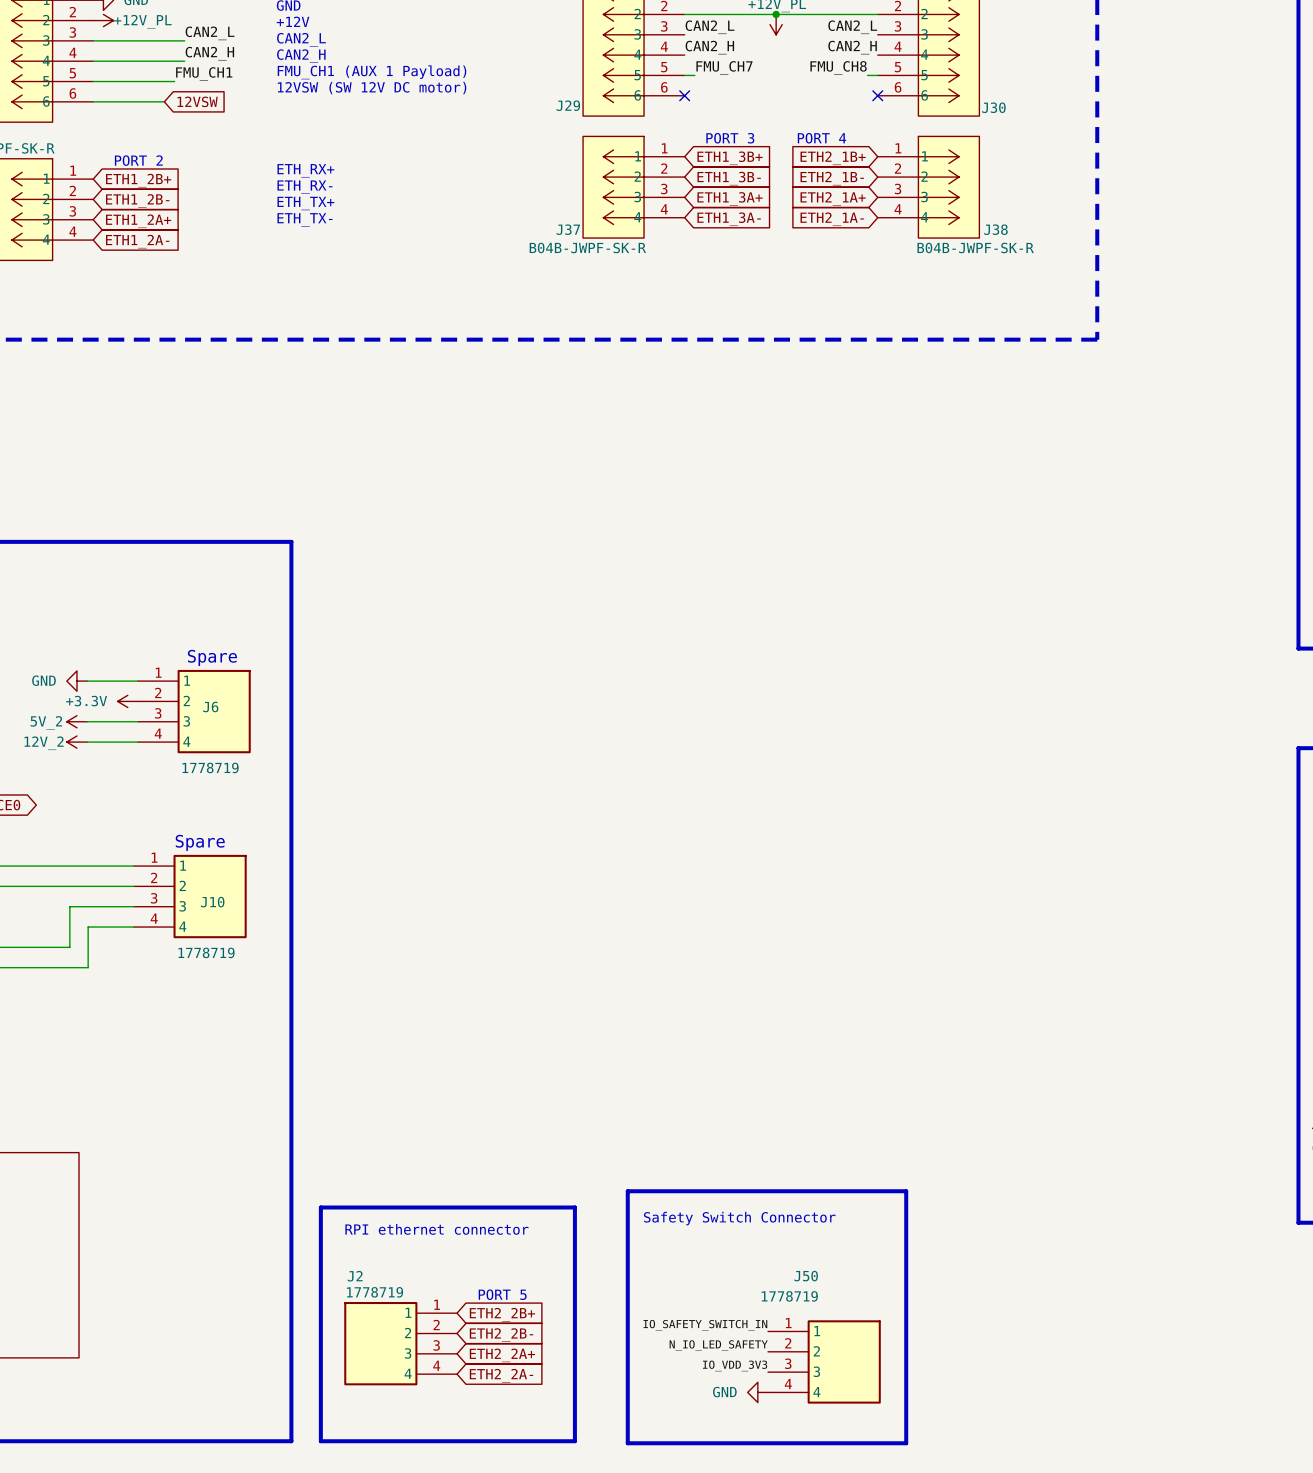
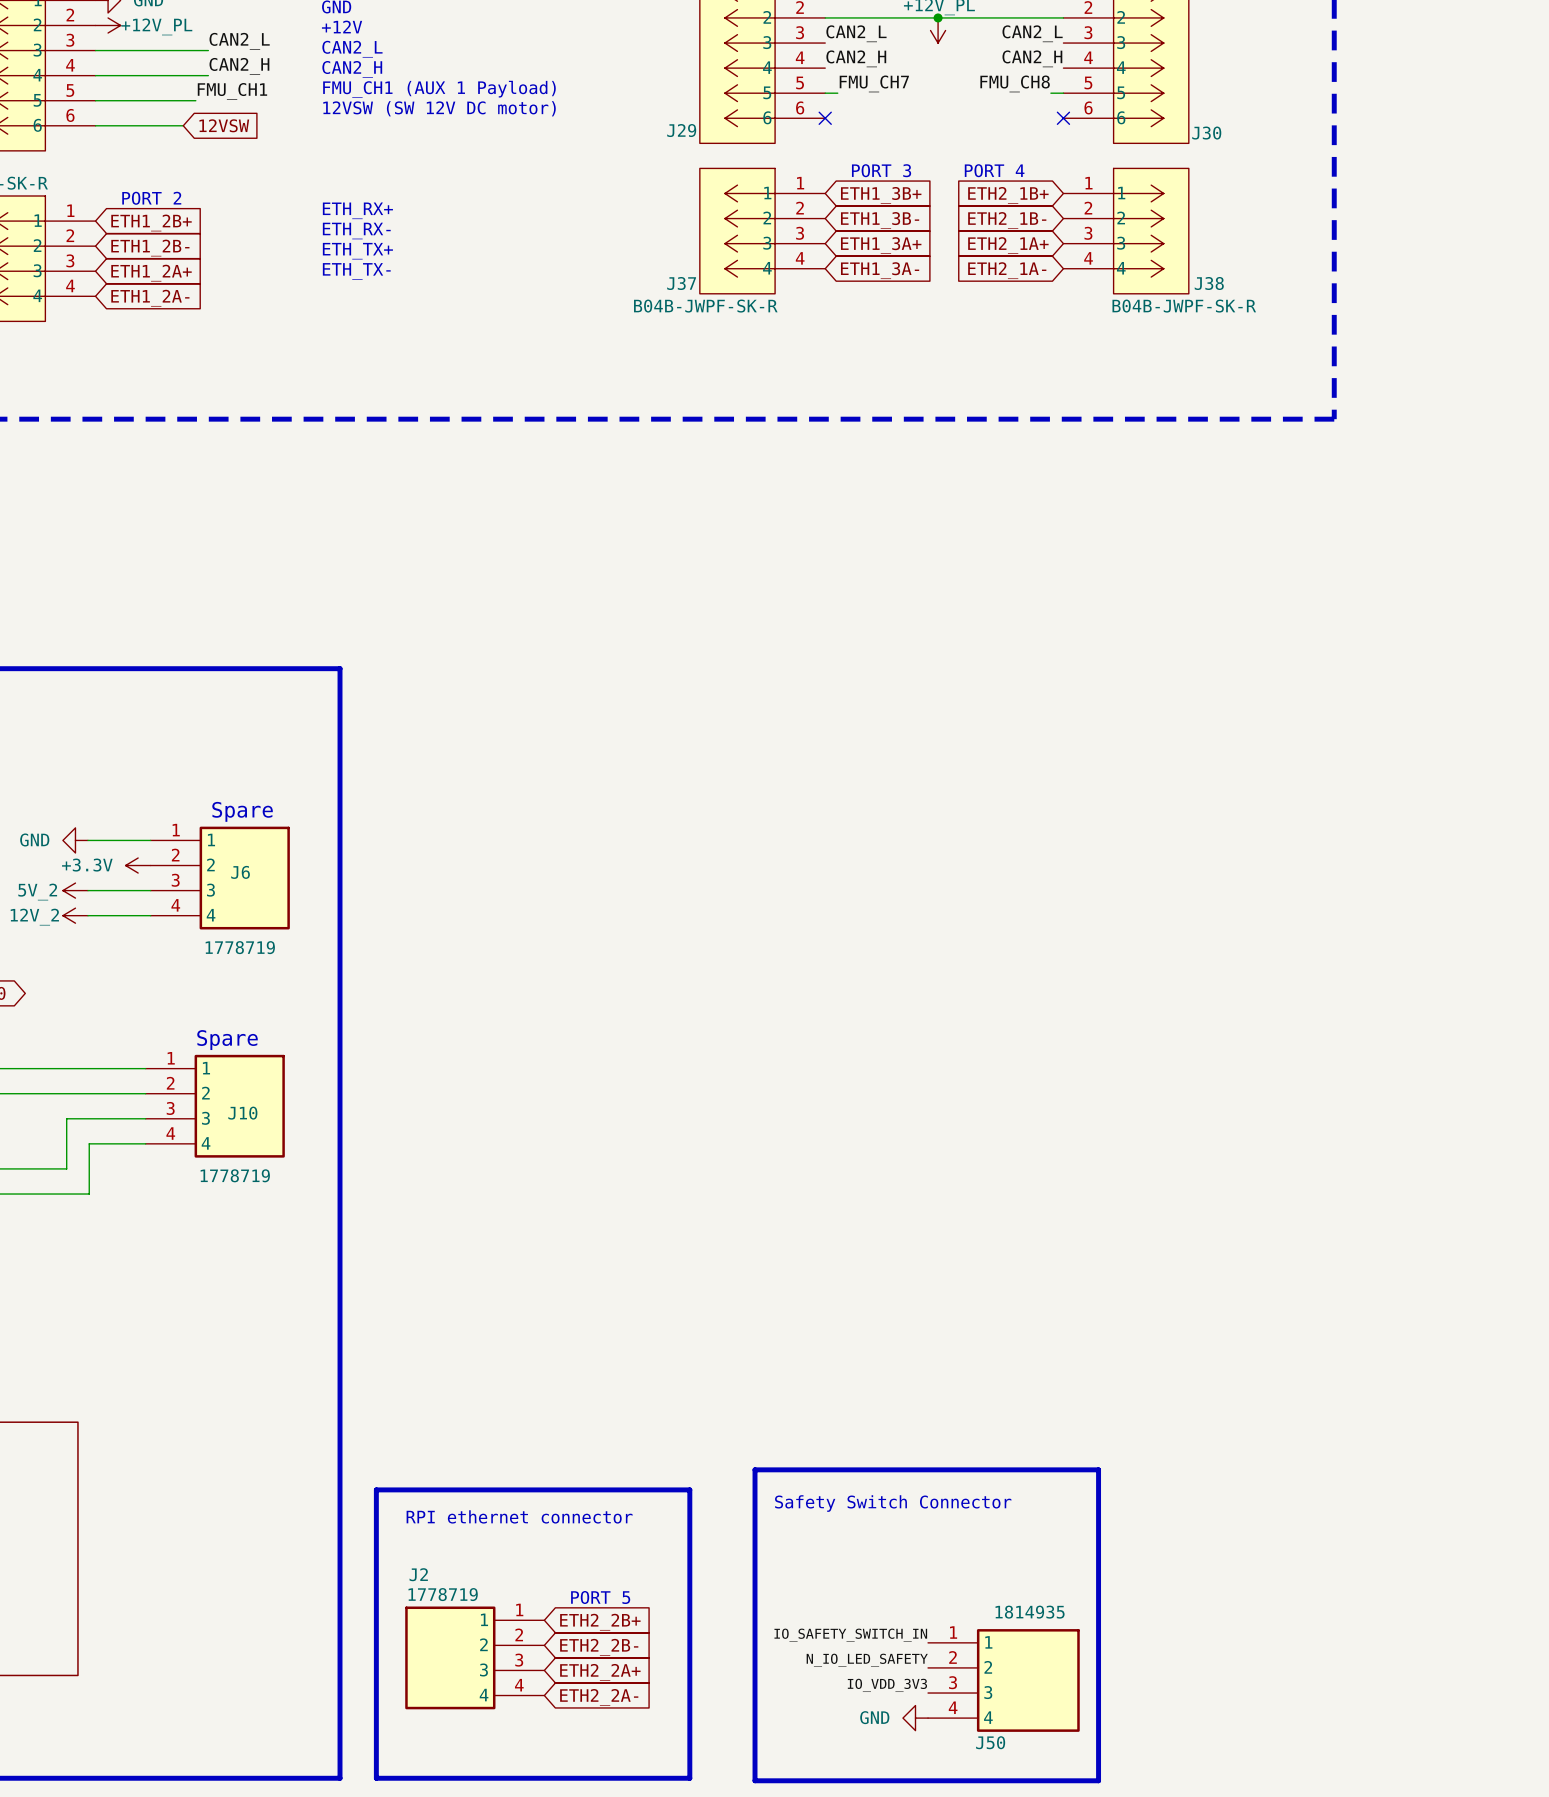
J50 name position: J50 (806, 1276) -> J50 (990, 1742)
J50 value: 1778719 (789, 1296) -> 1814935 (1030, 1612)
J50 symbol: [768, 1320, 881, 1404] -> [928, 1629, 1080, 1732]

